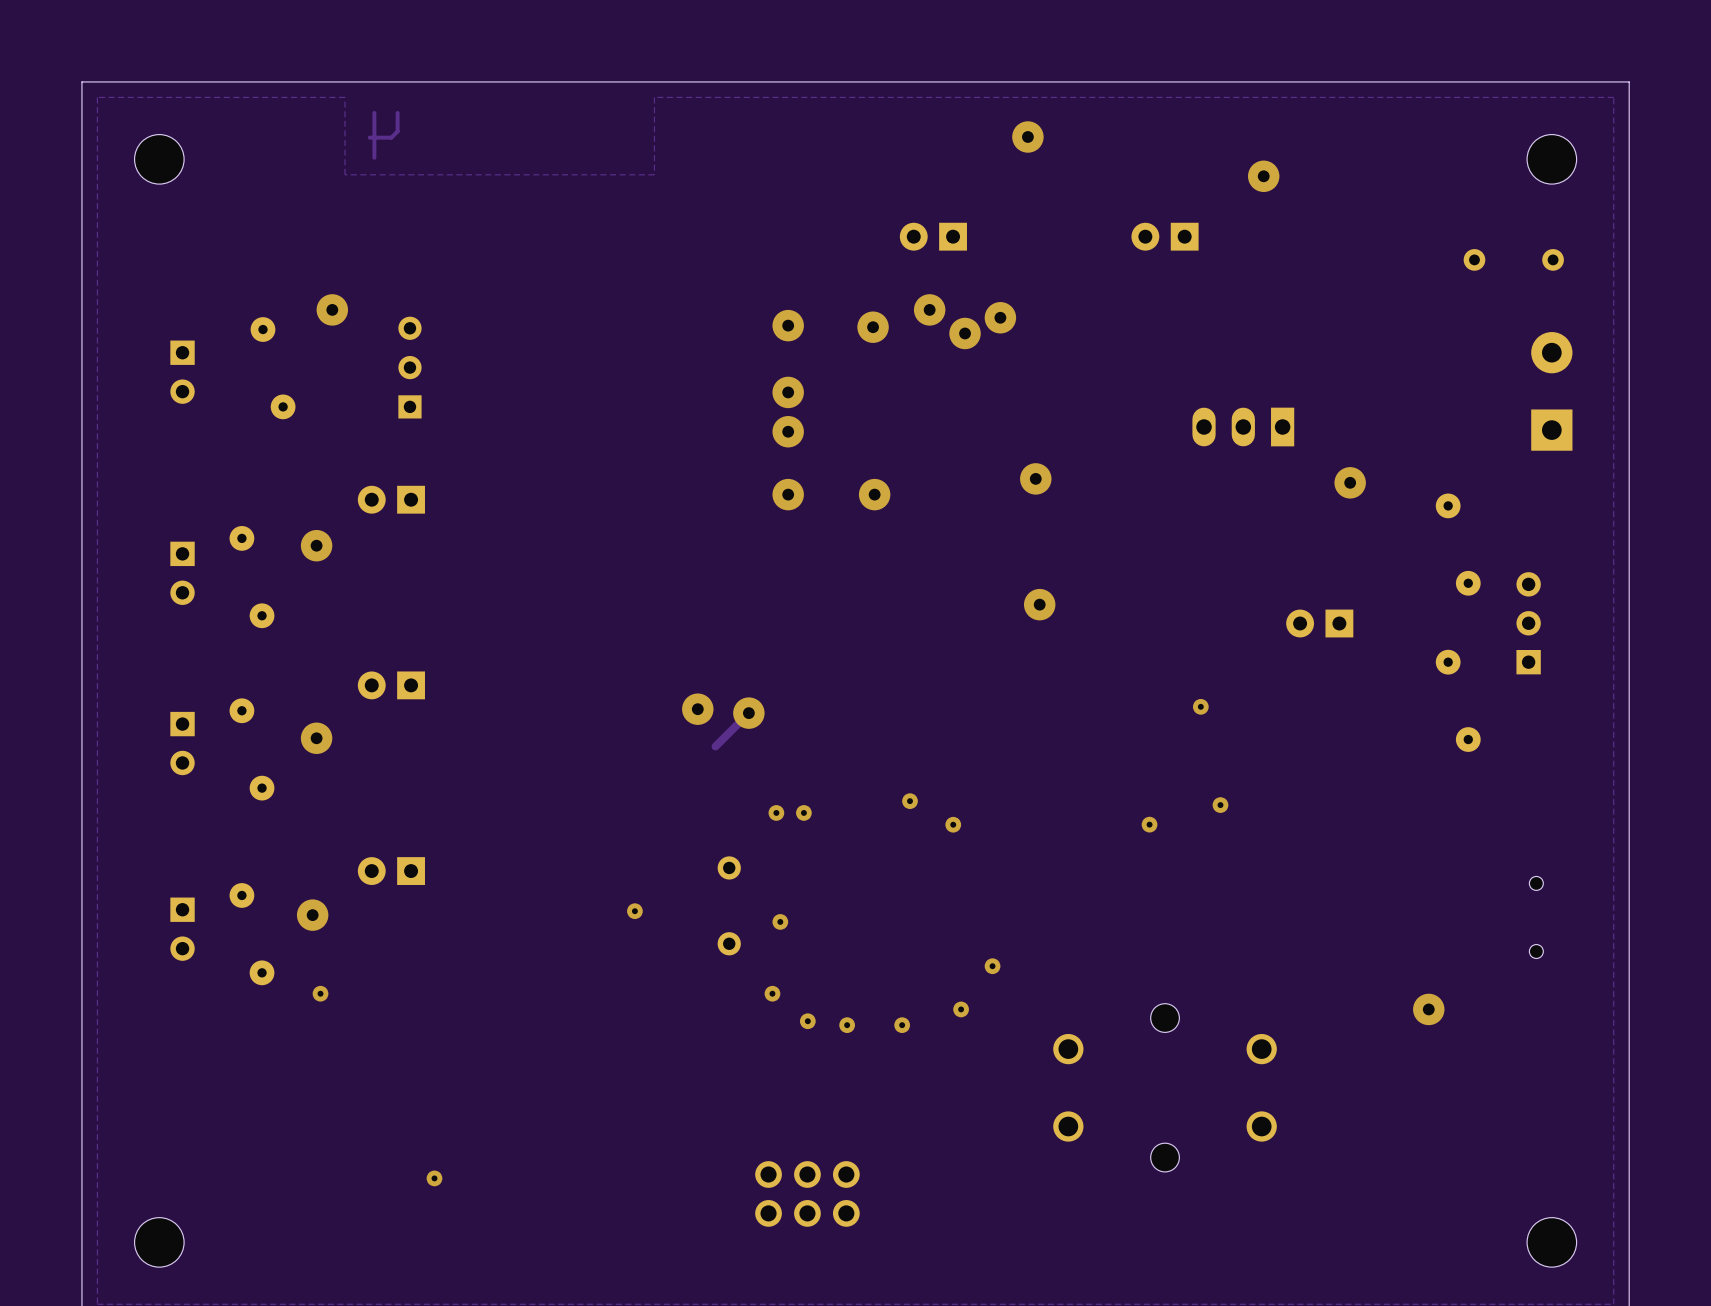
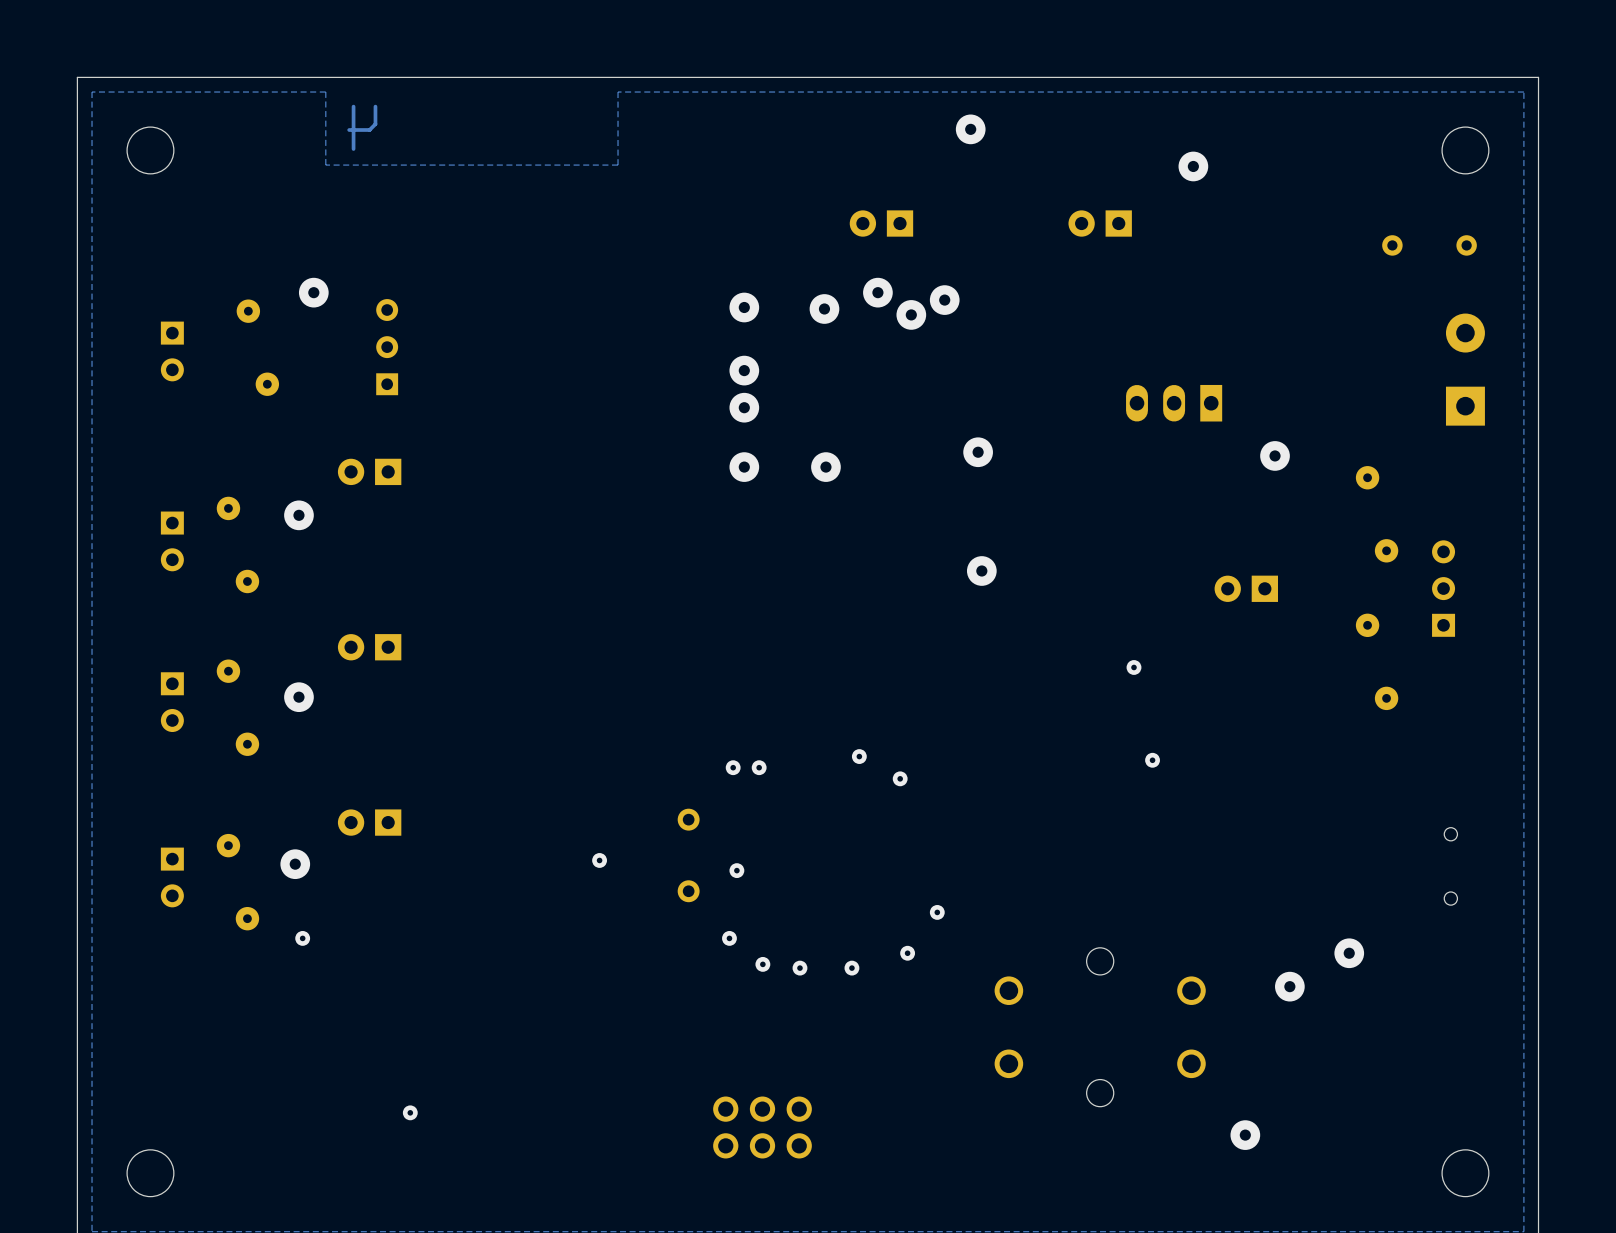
via: (697, 709) -> none
track: (748, 713) (715, 746) -> none
via: (748, 713) -> none
via: (1149, 824) -> none
via: none -> (1289, 986)
via: none -> (1245, 1135)

